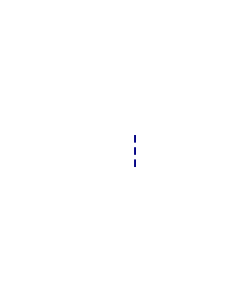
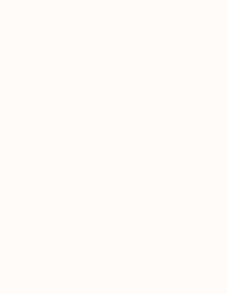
line: (135, 135) (135, 170) -> none

